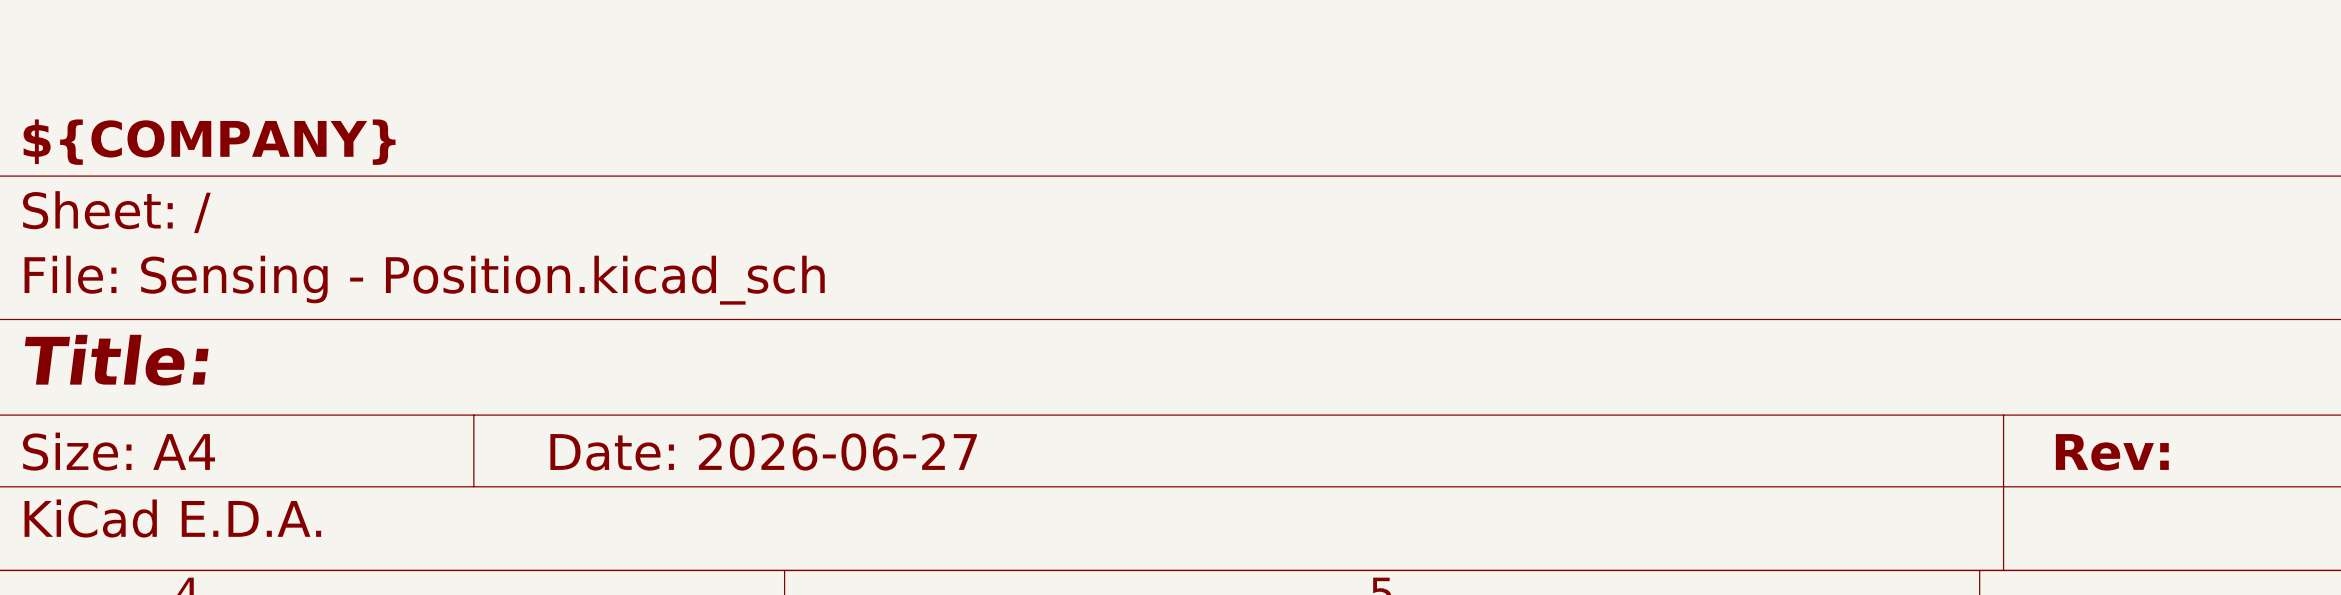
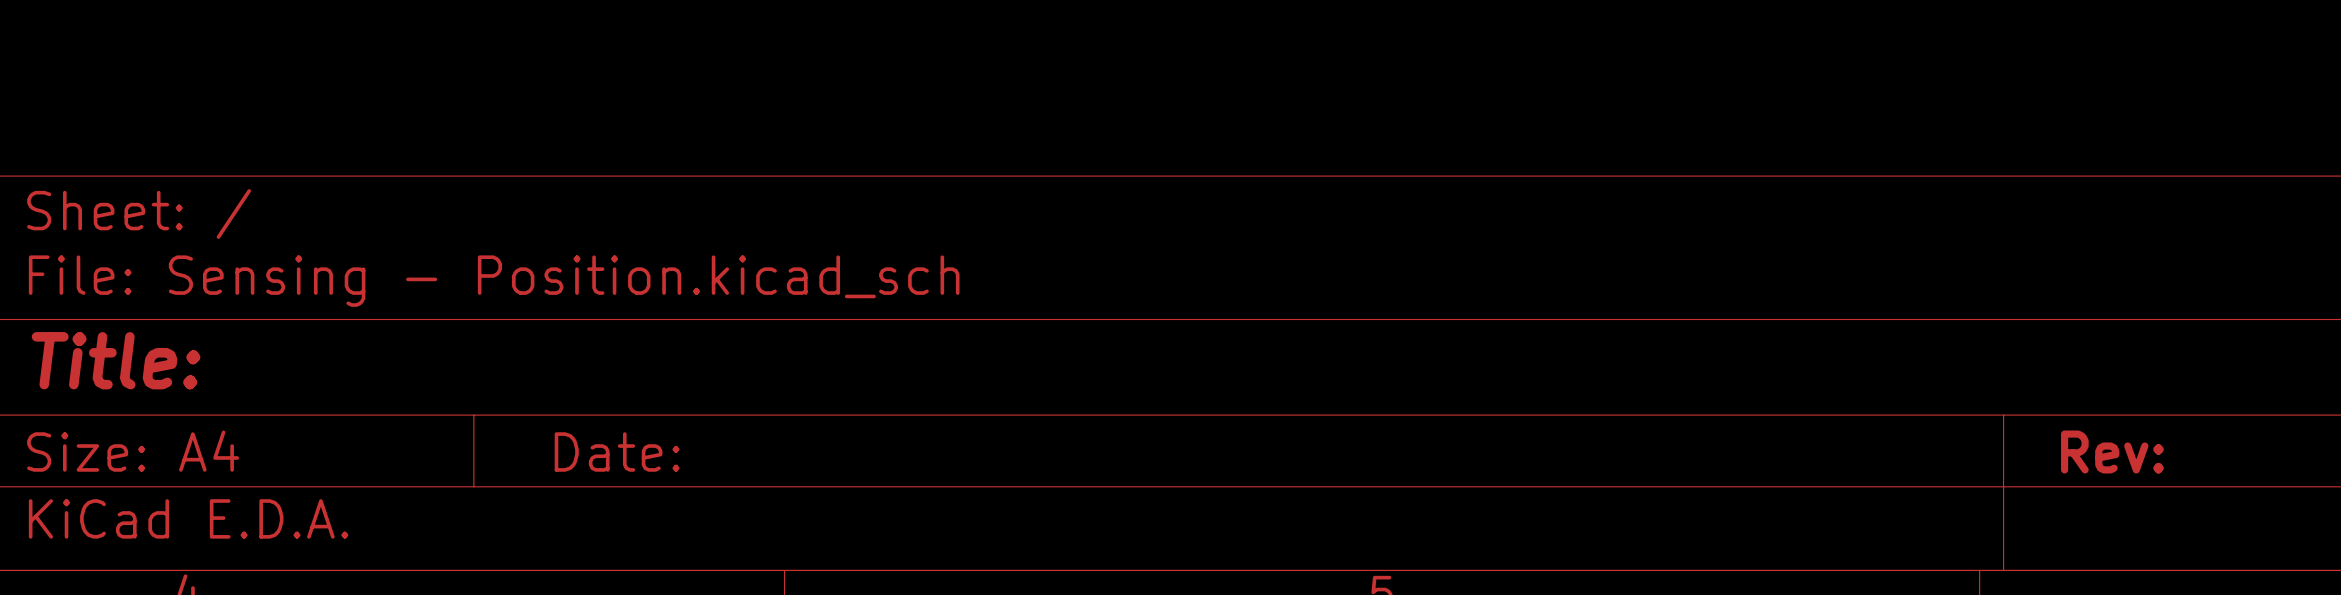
title block: ${COMPANY} (209, 142) -> none
title block: Date: 2026-06-27 (763, 452) -> Date: (617, 452)

